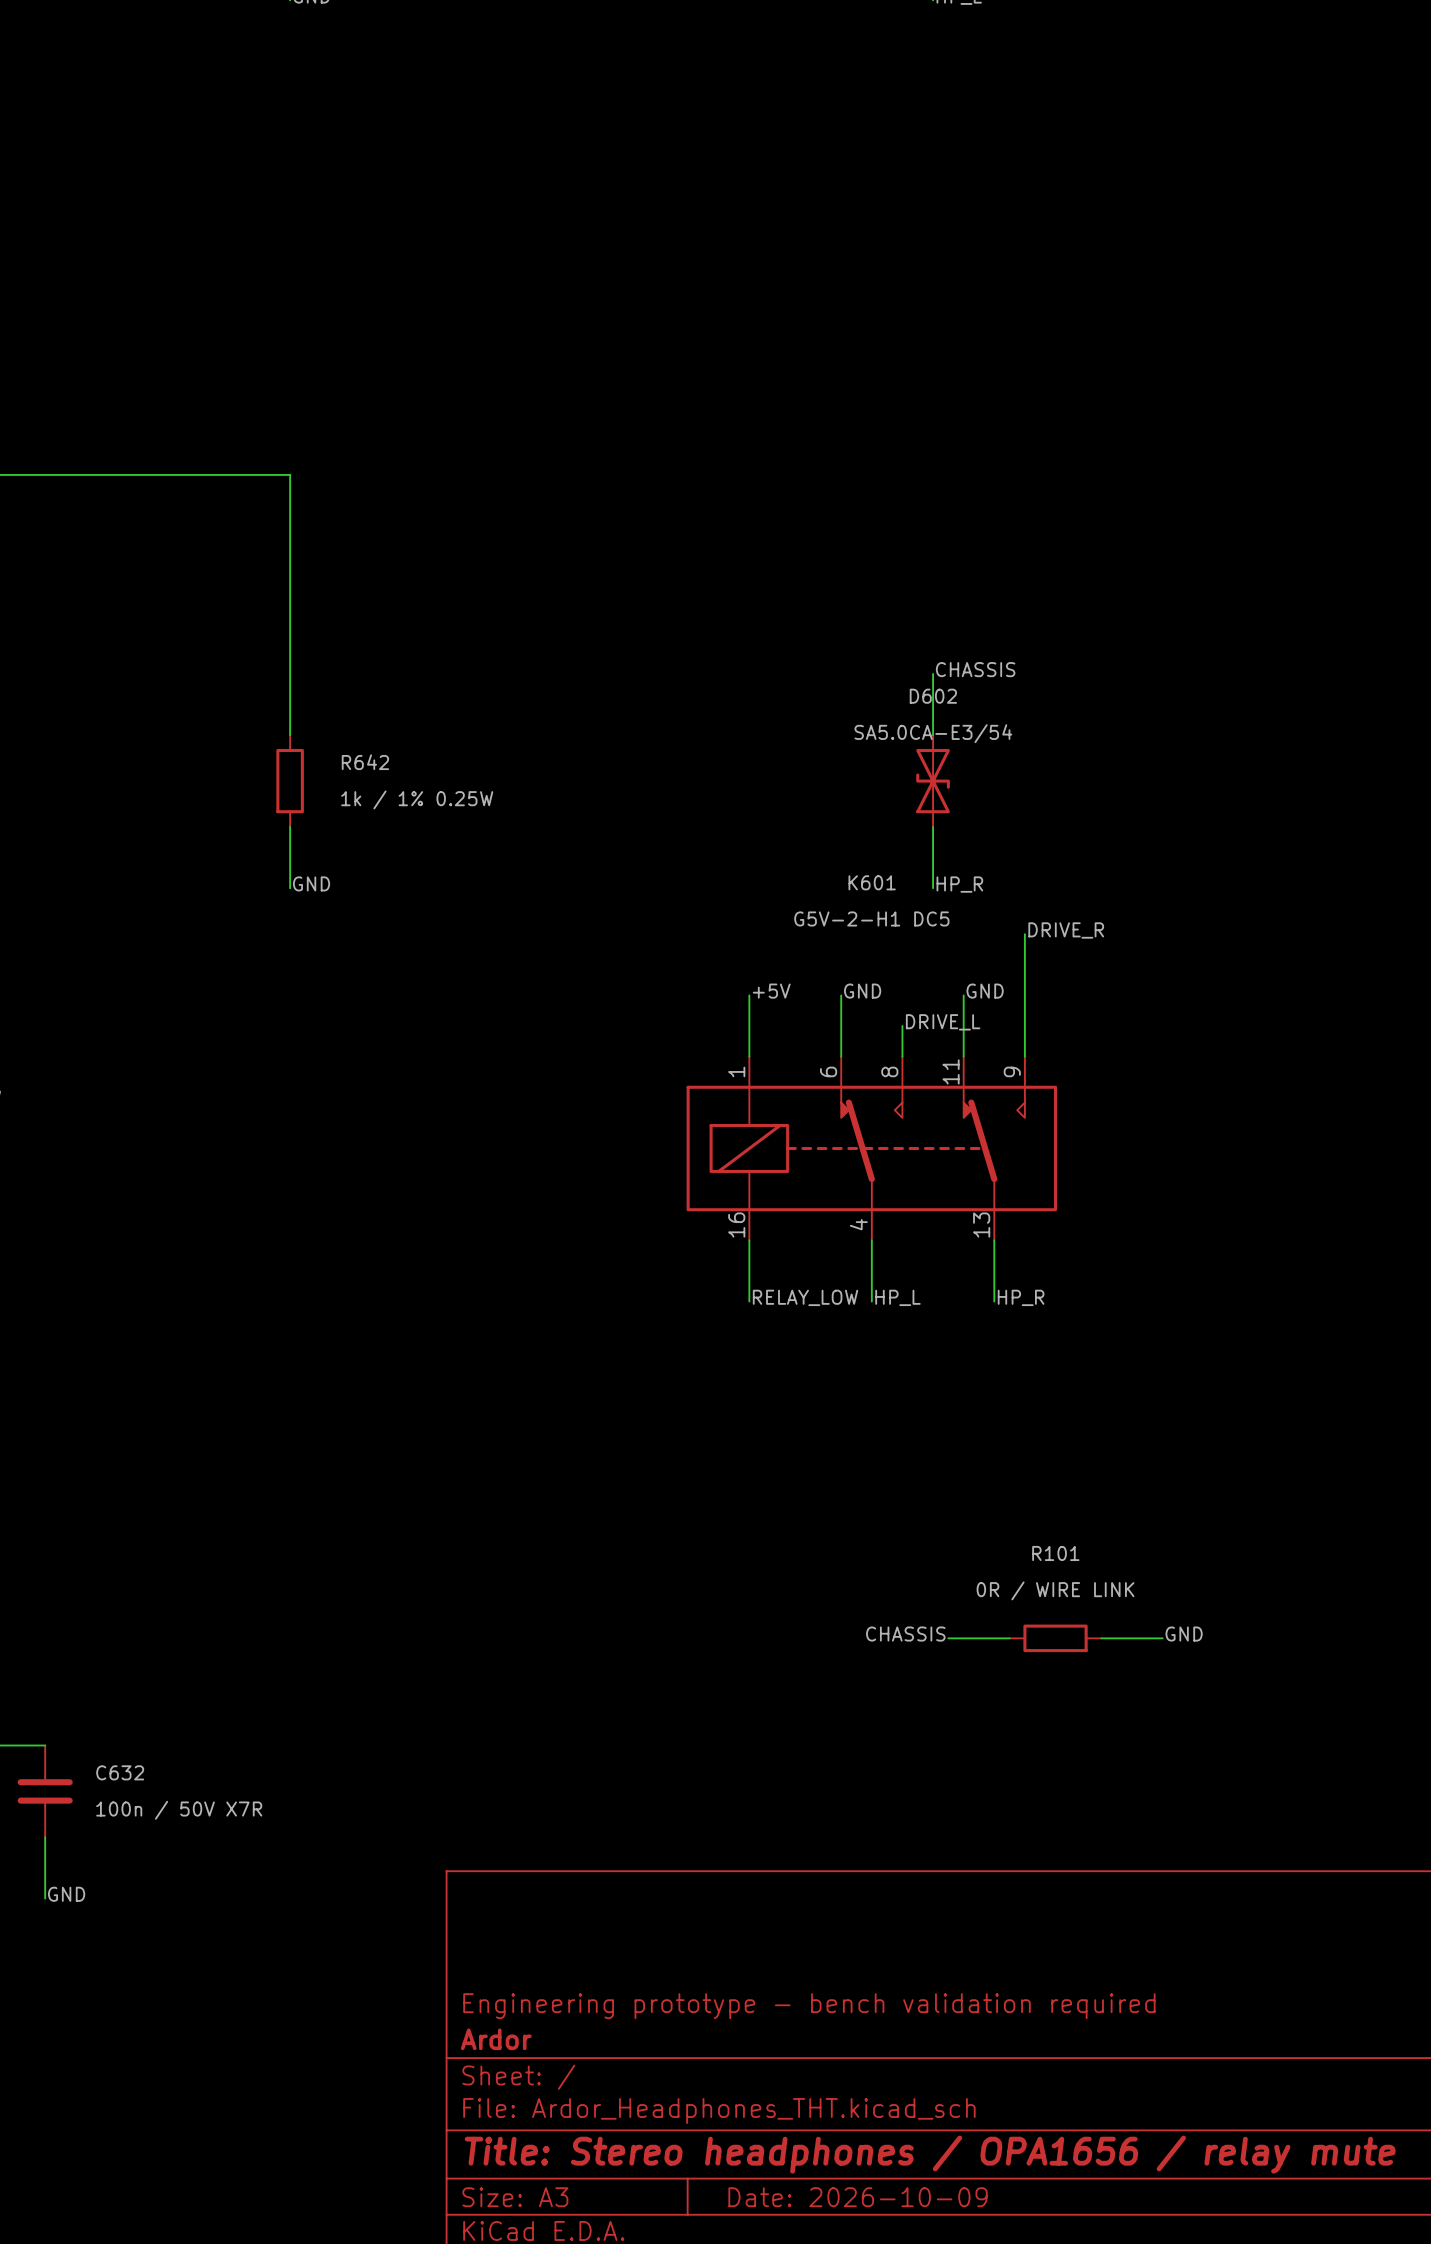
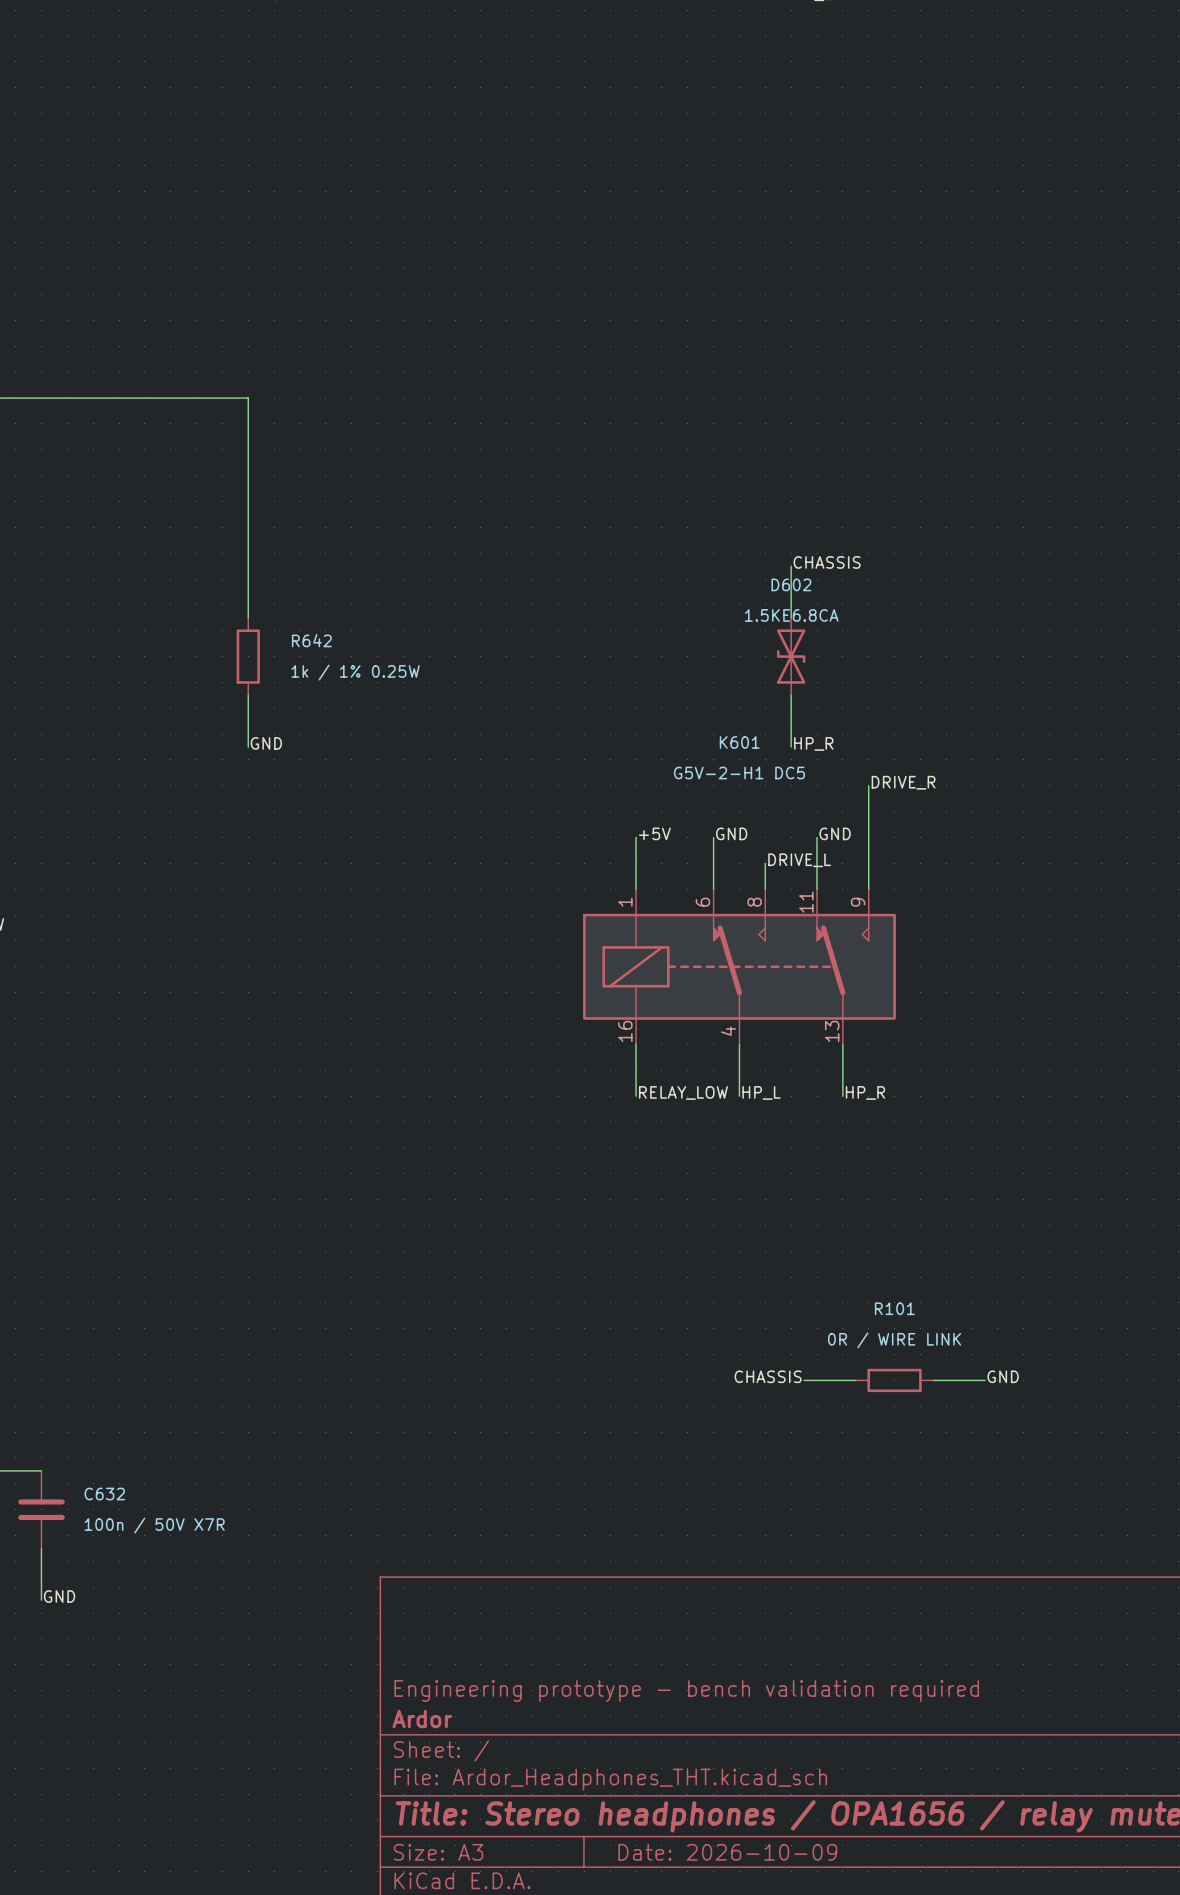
D602 value: SA5.0CA-E3/54 (933, 733) -> 1.5KE6.8CA (791, 615)

